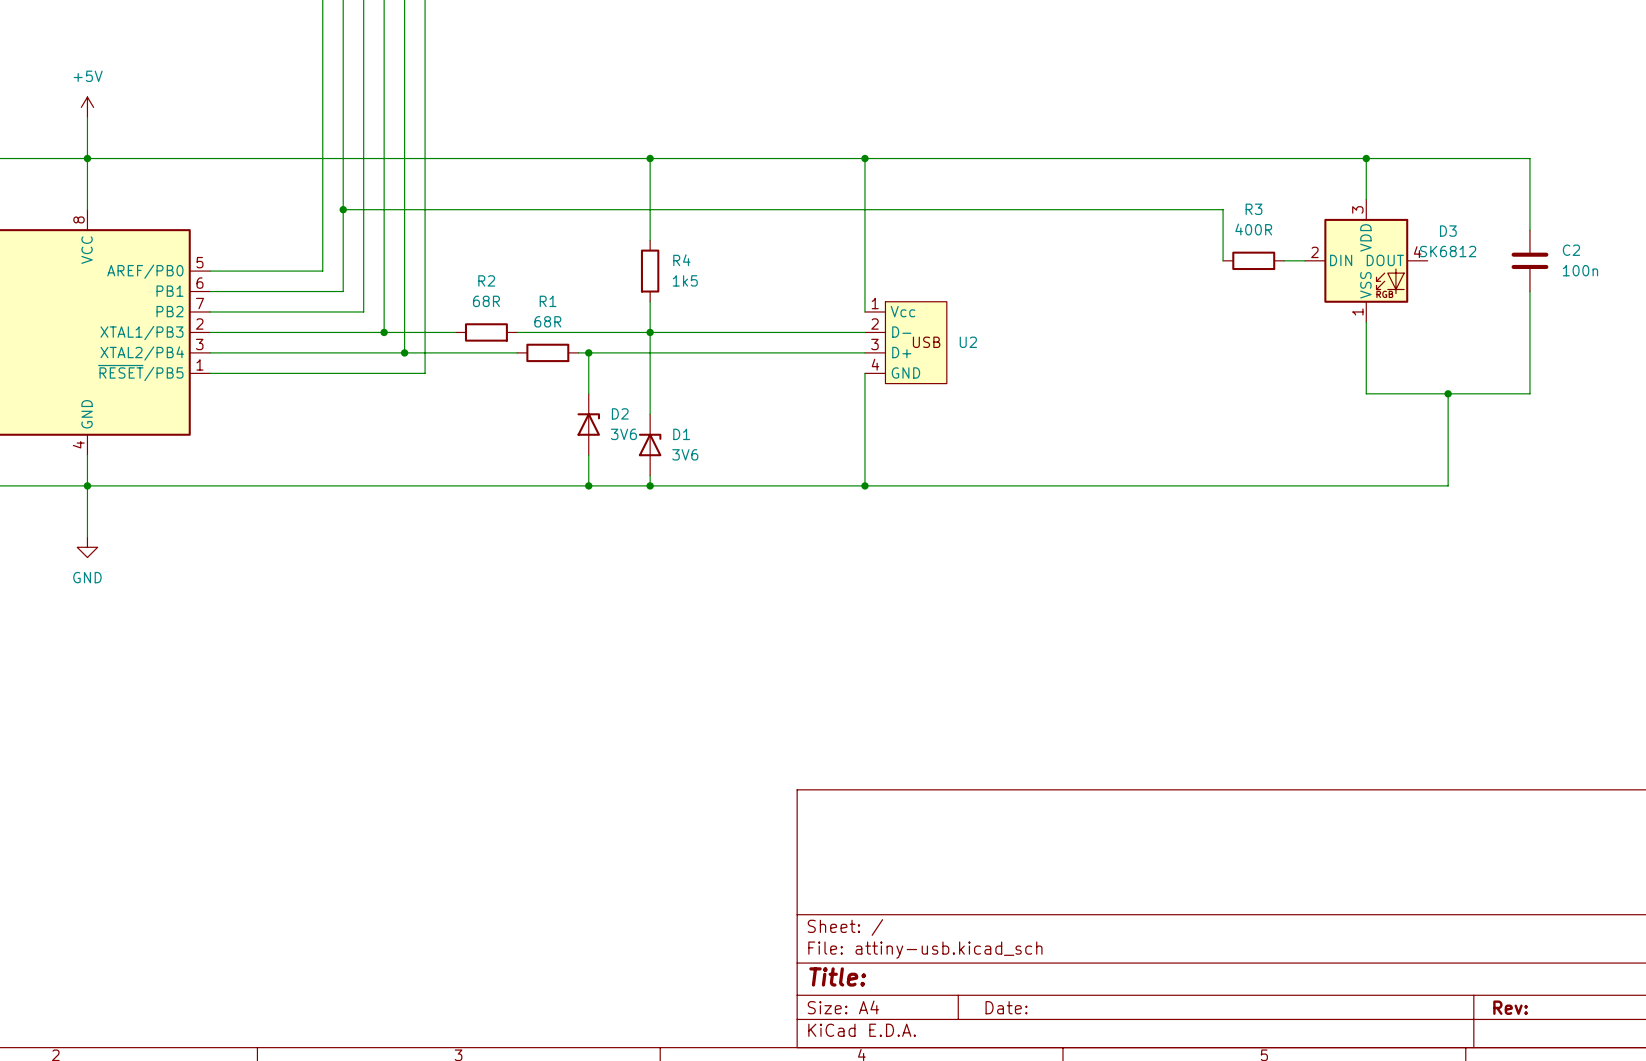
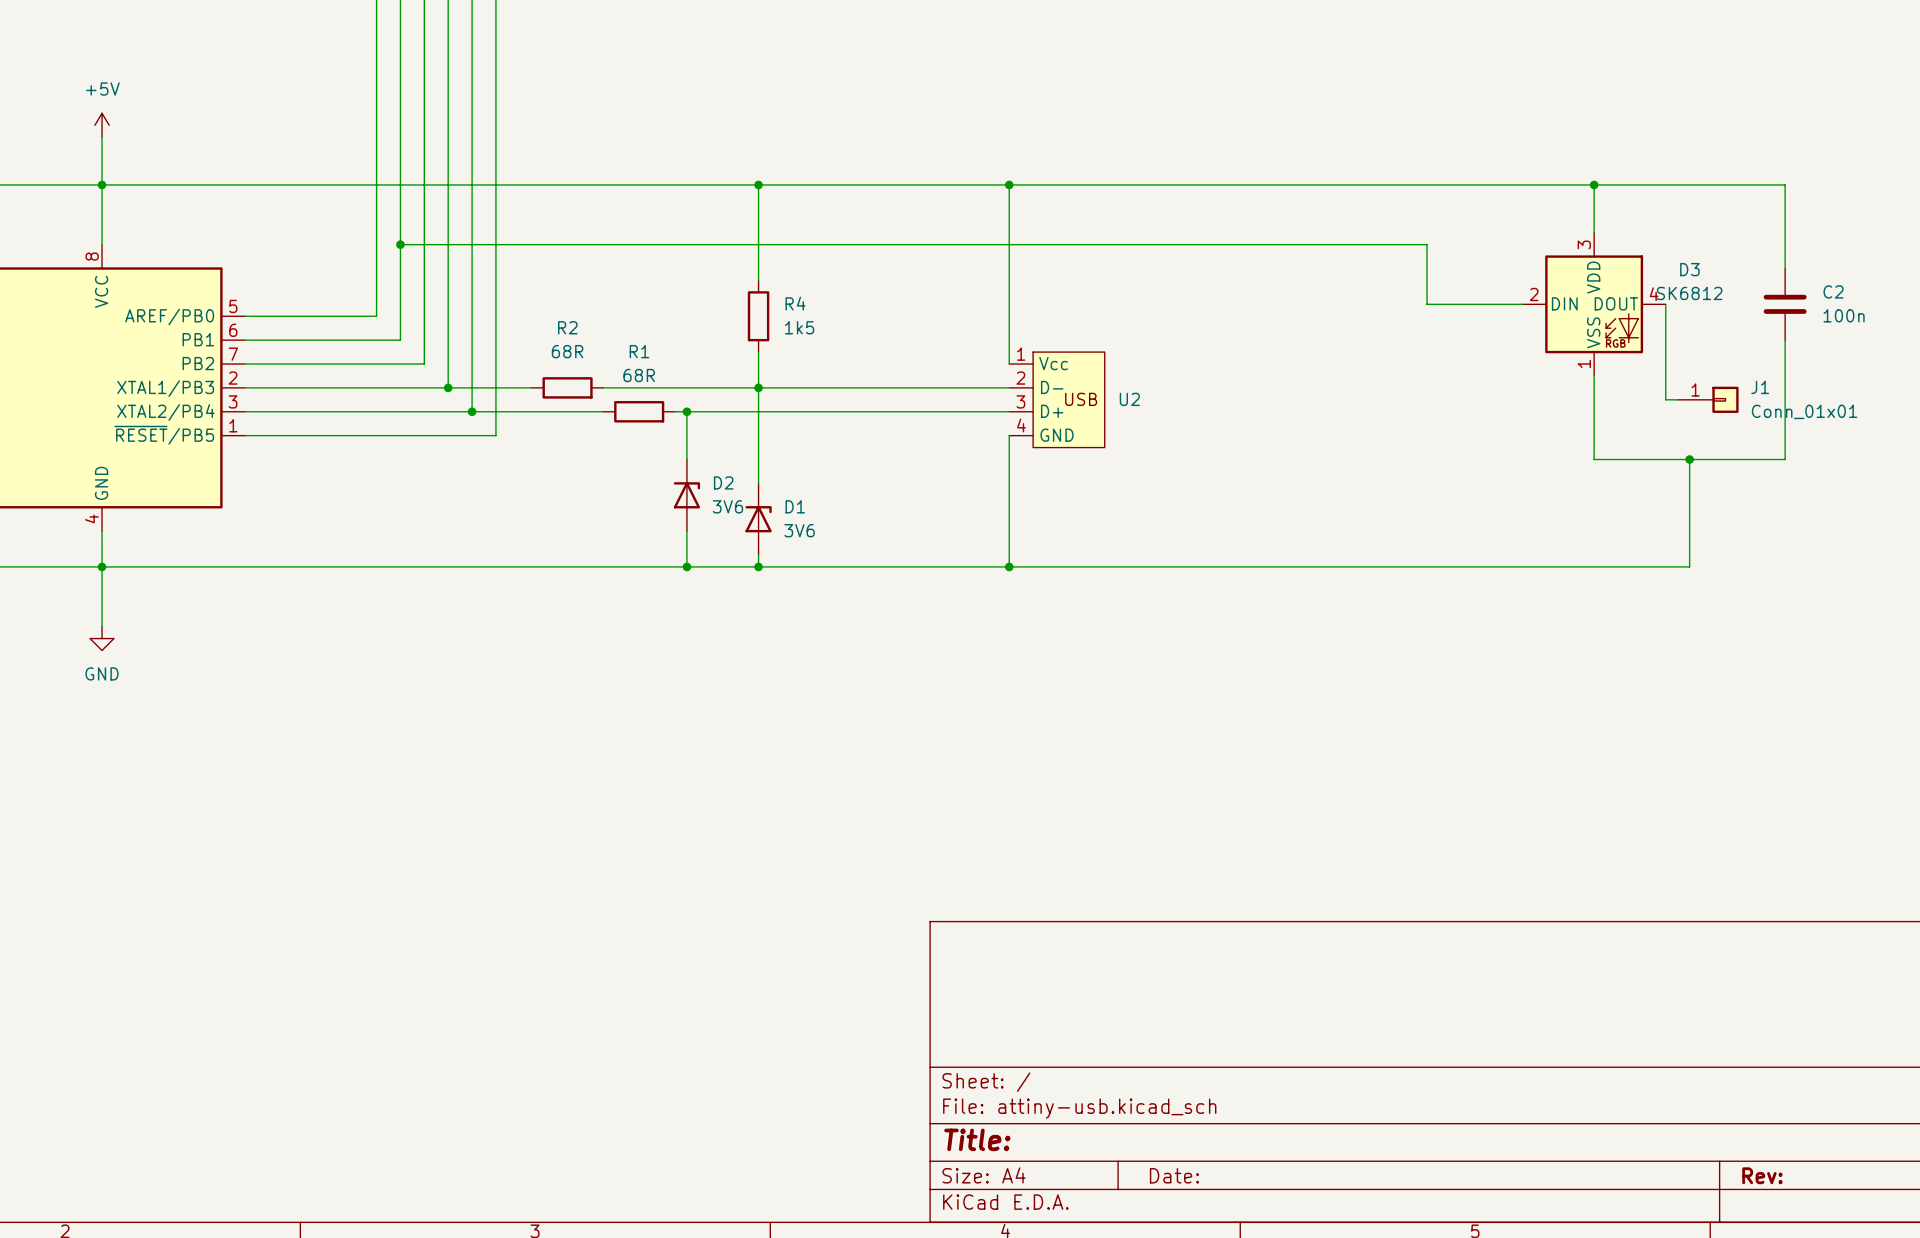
wire: none -> (1427, 304) (1498, 304)
R3: 400R (1253, 260) -> none
wire: none -> (1665, 304) (1665, 399) (1677, 399)
J1: none -> Conn_01x01 (1708, 399)

